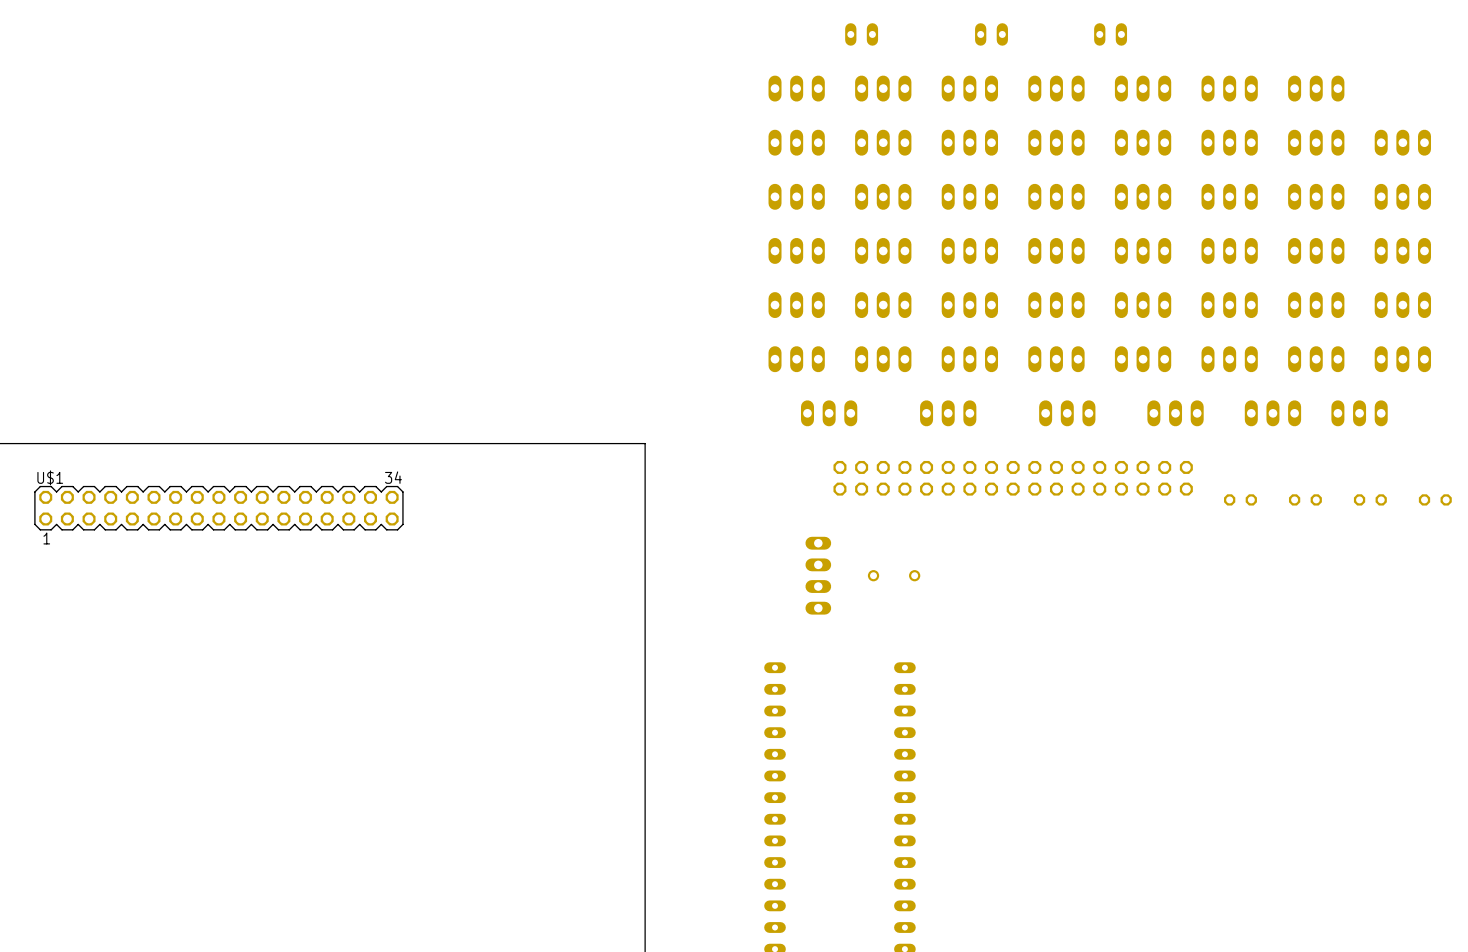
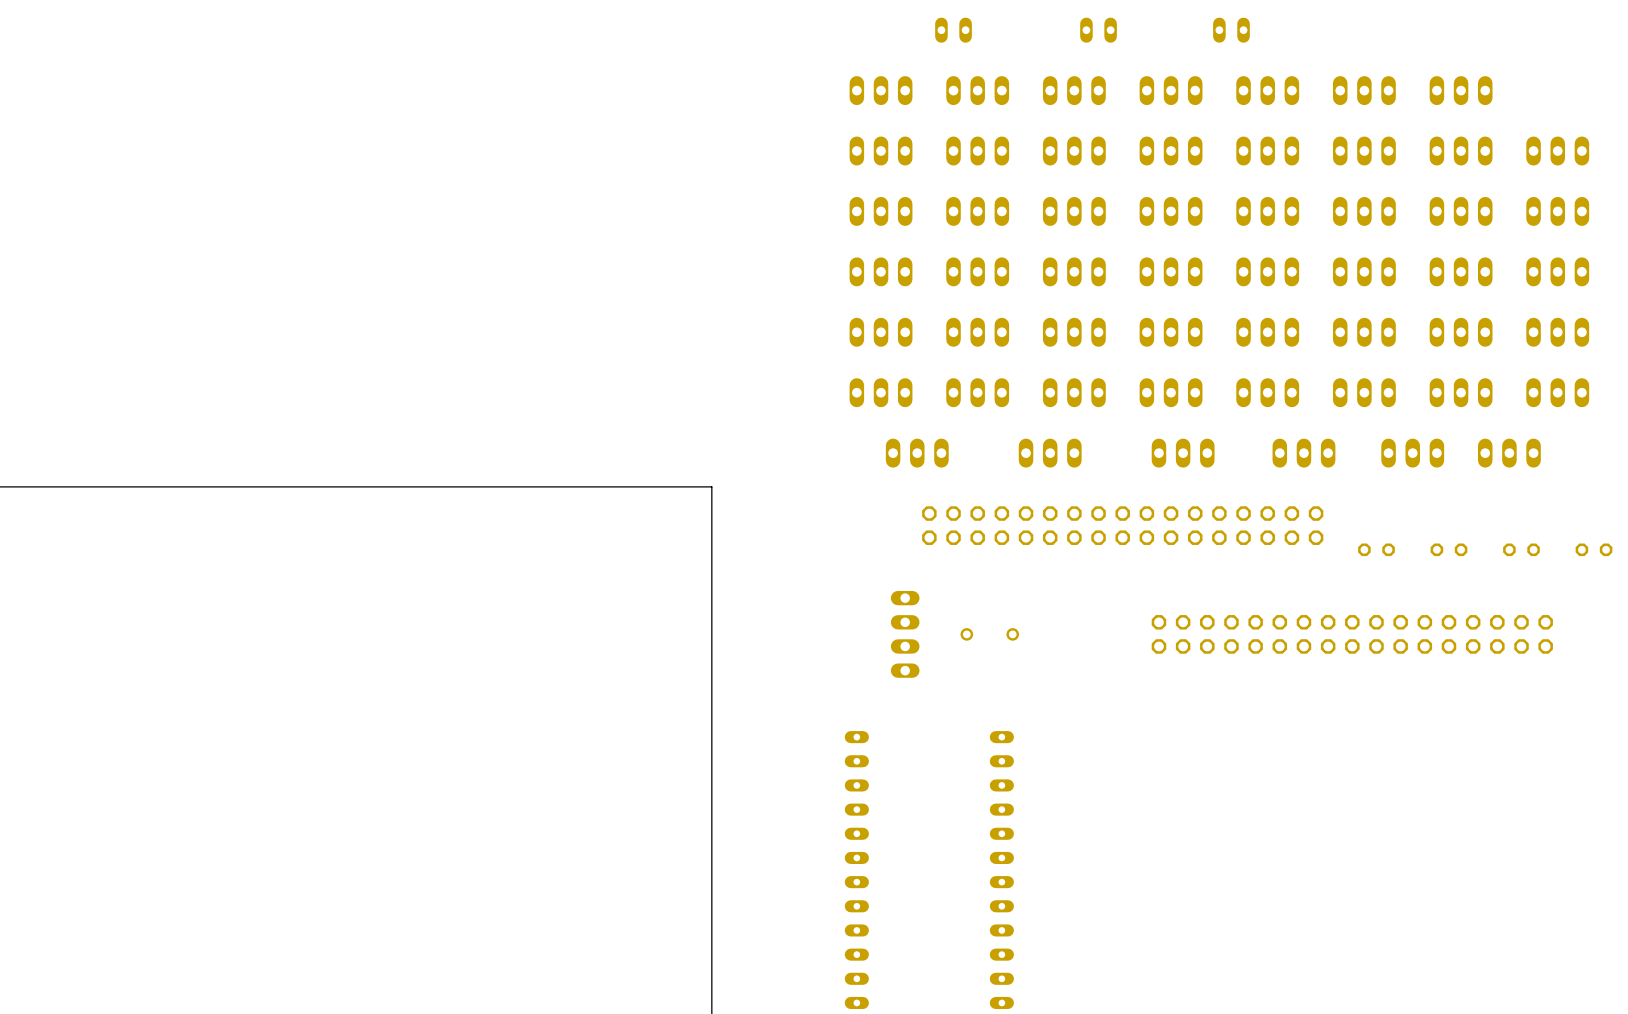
U$1: (218, 508) -> none
part: none -> (1352, 634)

